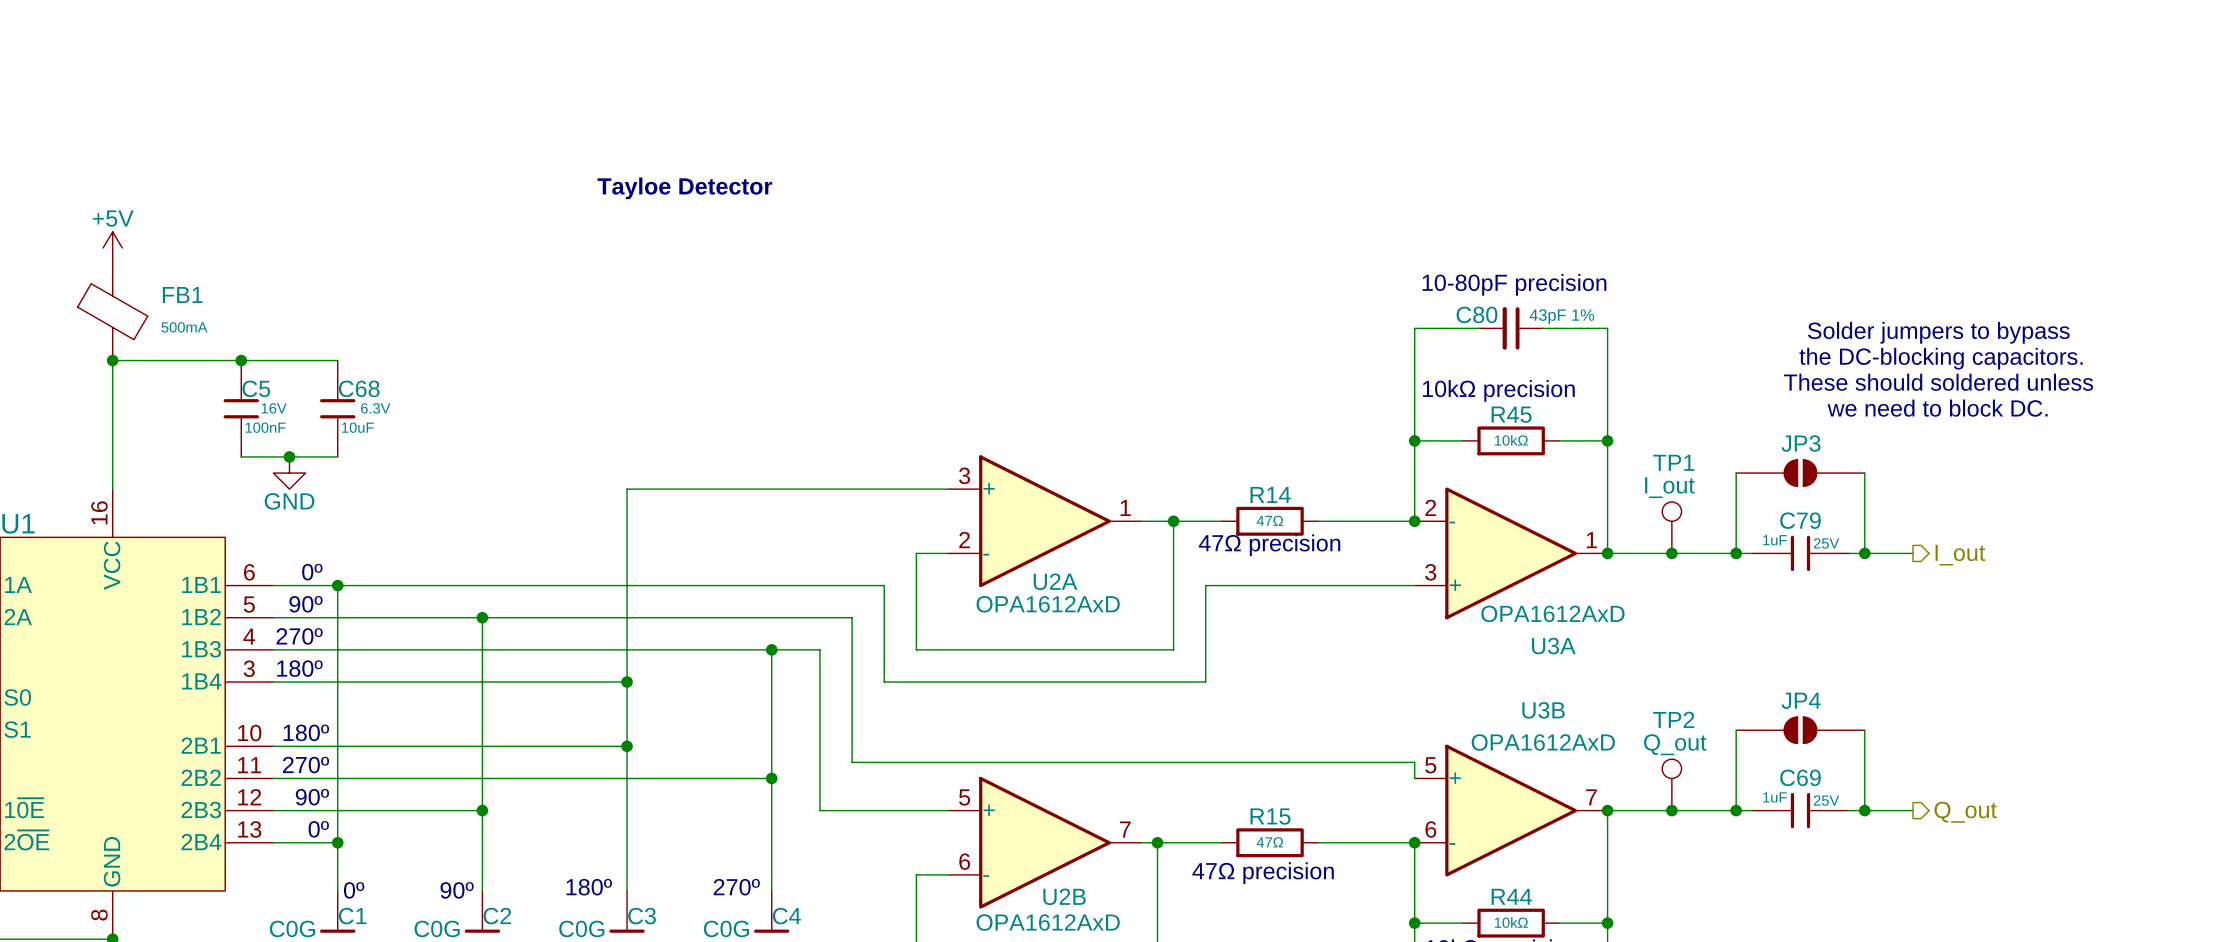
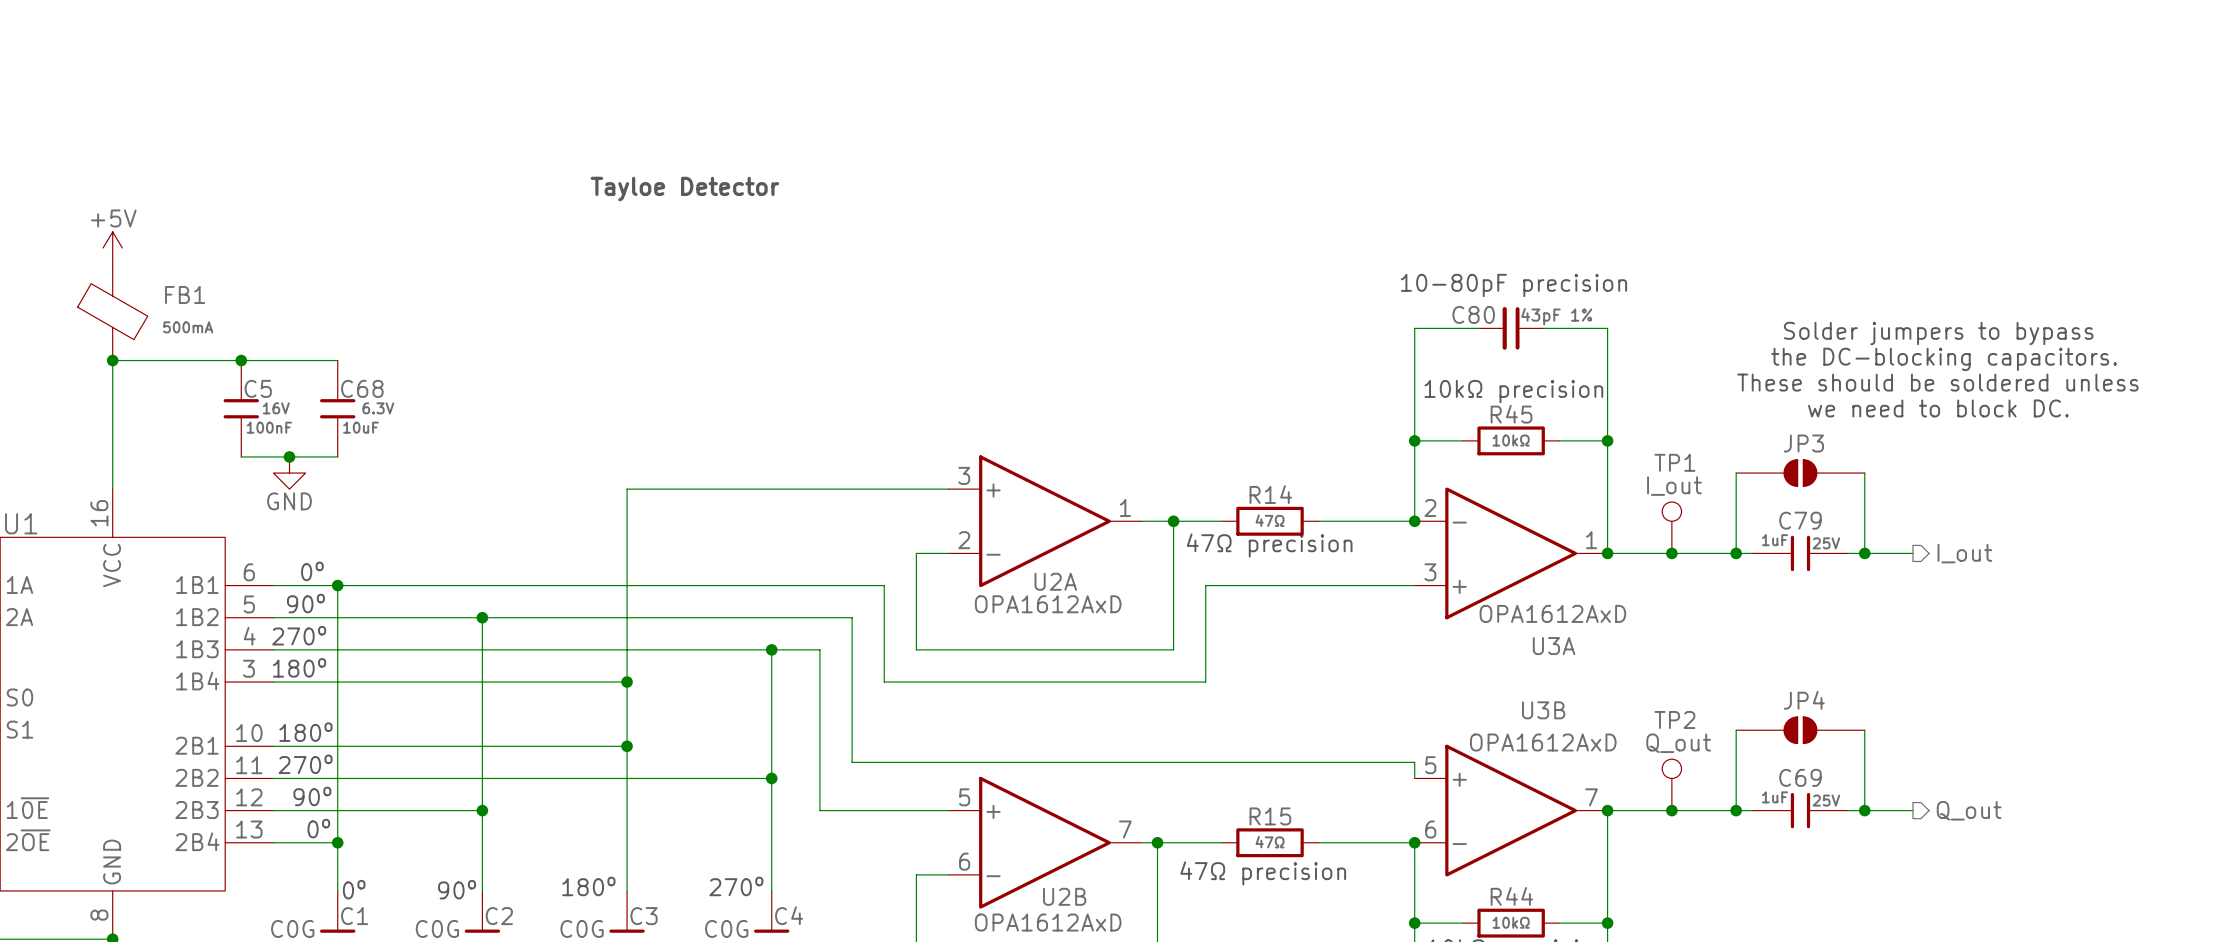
text: These should soldered unless (1938, 382) -> These should be soldered unless (1937, 382)

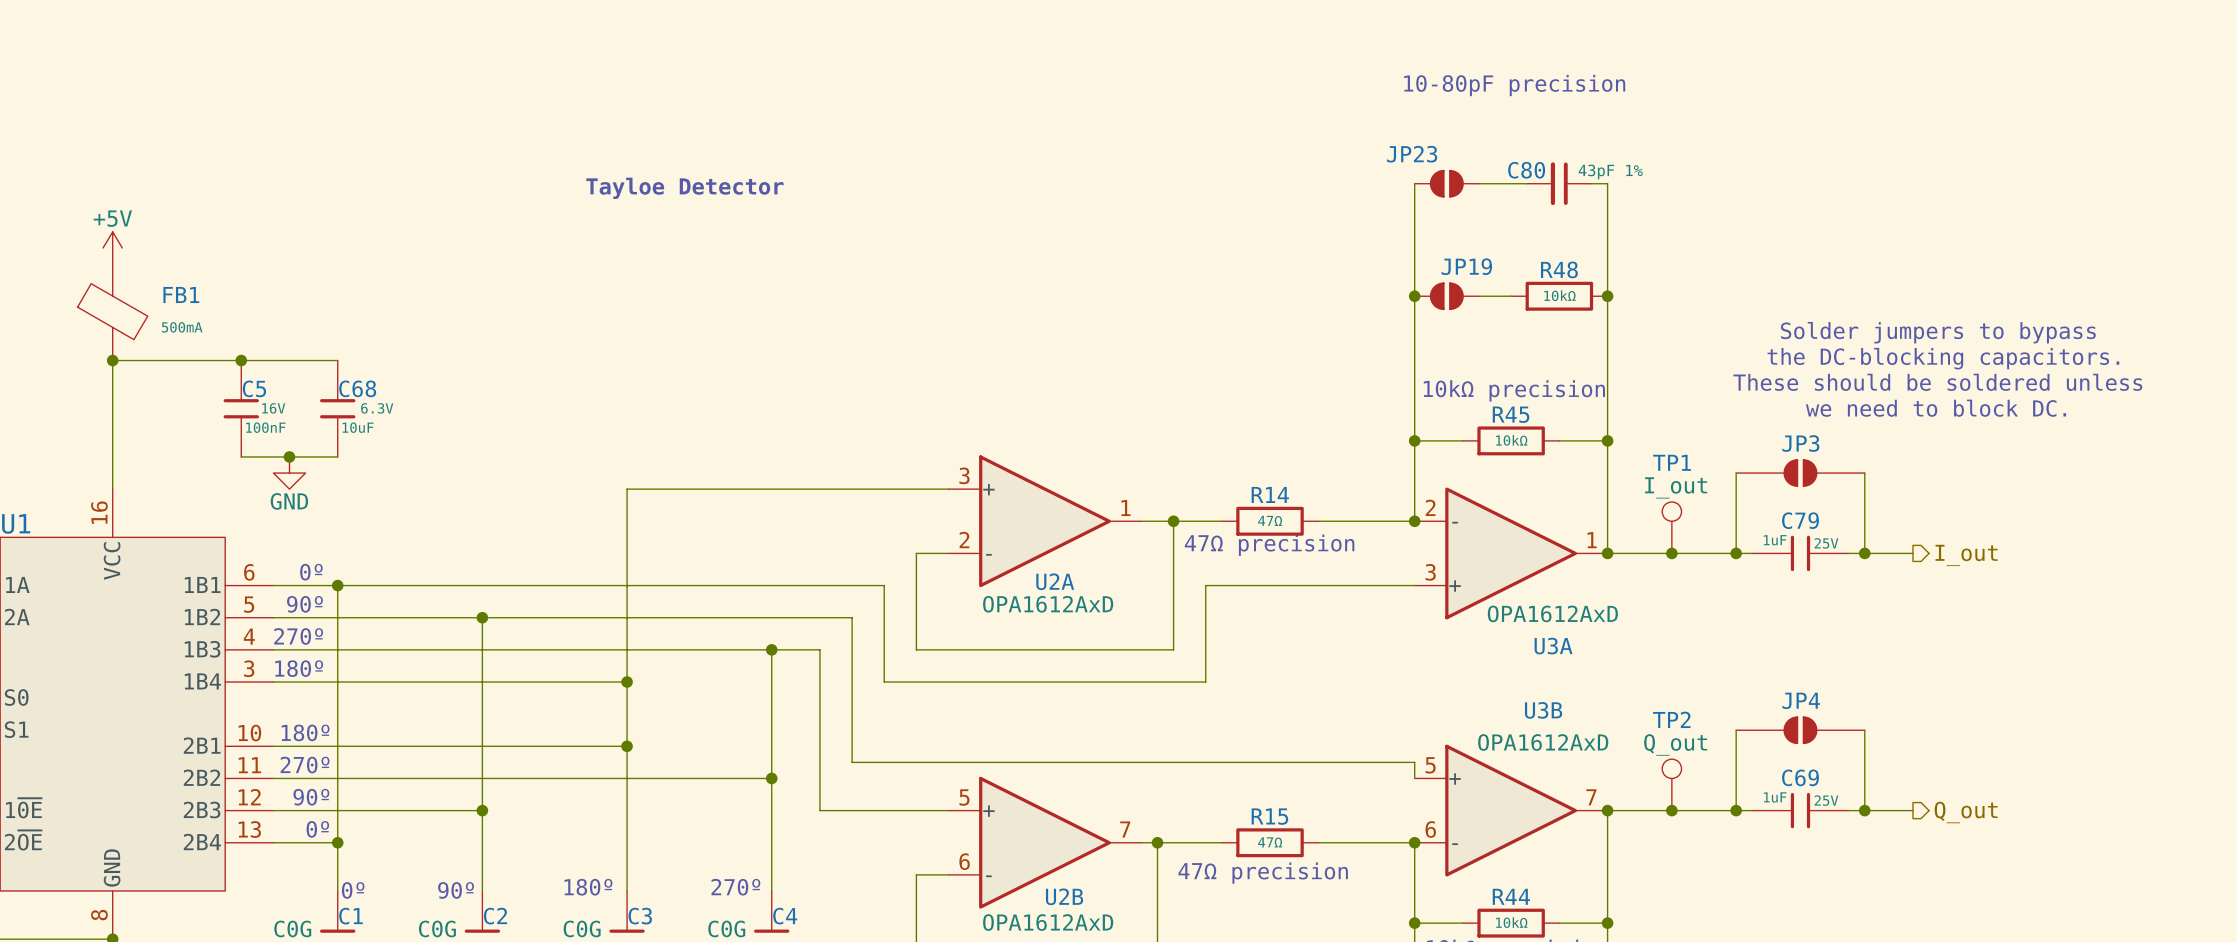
JP23: none -> (1446, 183)
wire: none -> (1478, 183) (1527, 183)
text position: 10-80pF precision (1513, 285) -> 10-80pF precision (1514, 85)
junction: none -> (1414, 296)
JP19: none -> (1446, 296)
wire: none -> (1478, 296) (1511, 296)
R48: none -> 10kΩ (1559, 296)
junction: none -> (1607, 296)
wire: (1414, 328) (1478, 328) -> (1414, 328) (1414, 183)
C80 position: (1511, 328) -> (1559, 183)
wire: (1543, 328) (1607, 328) -> (1591, 183) (1607, 183) (1607, 328)

